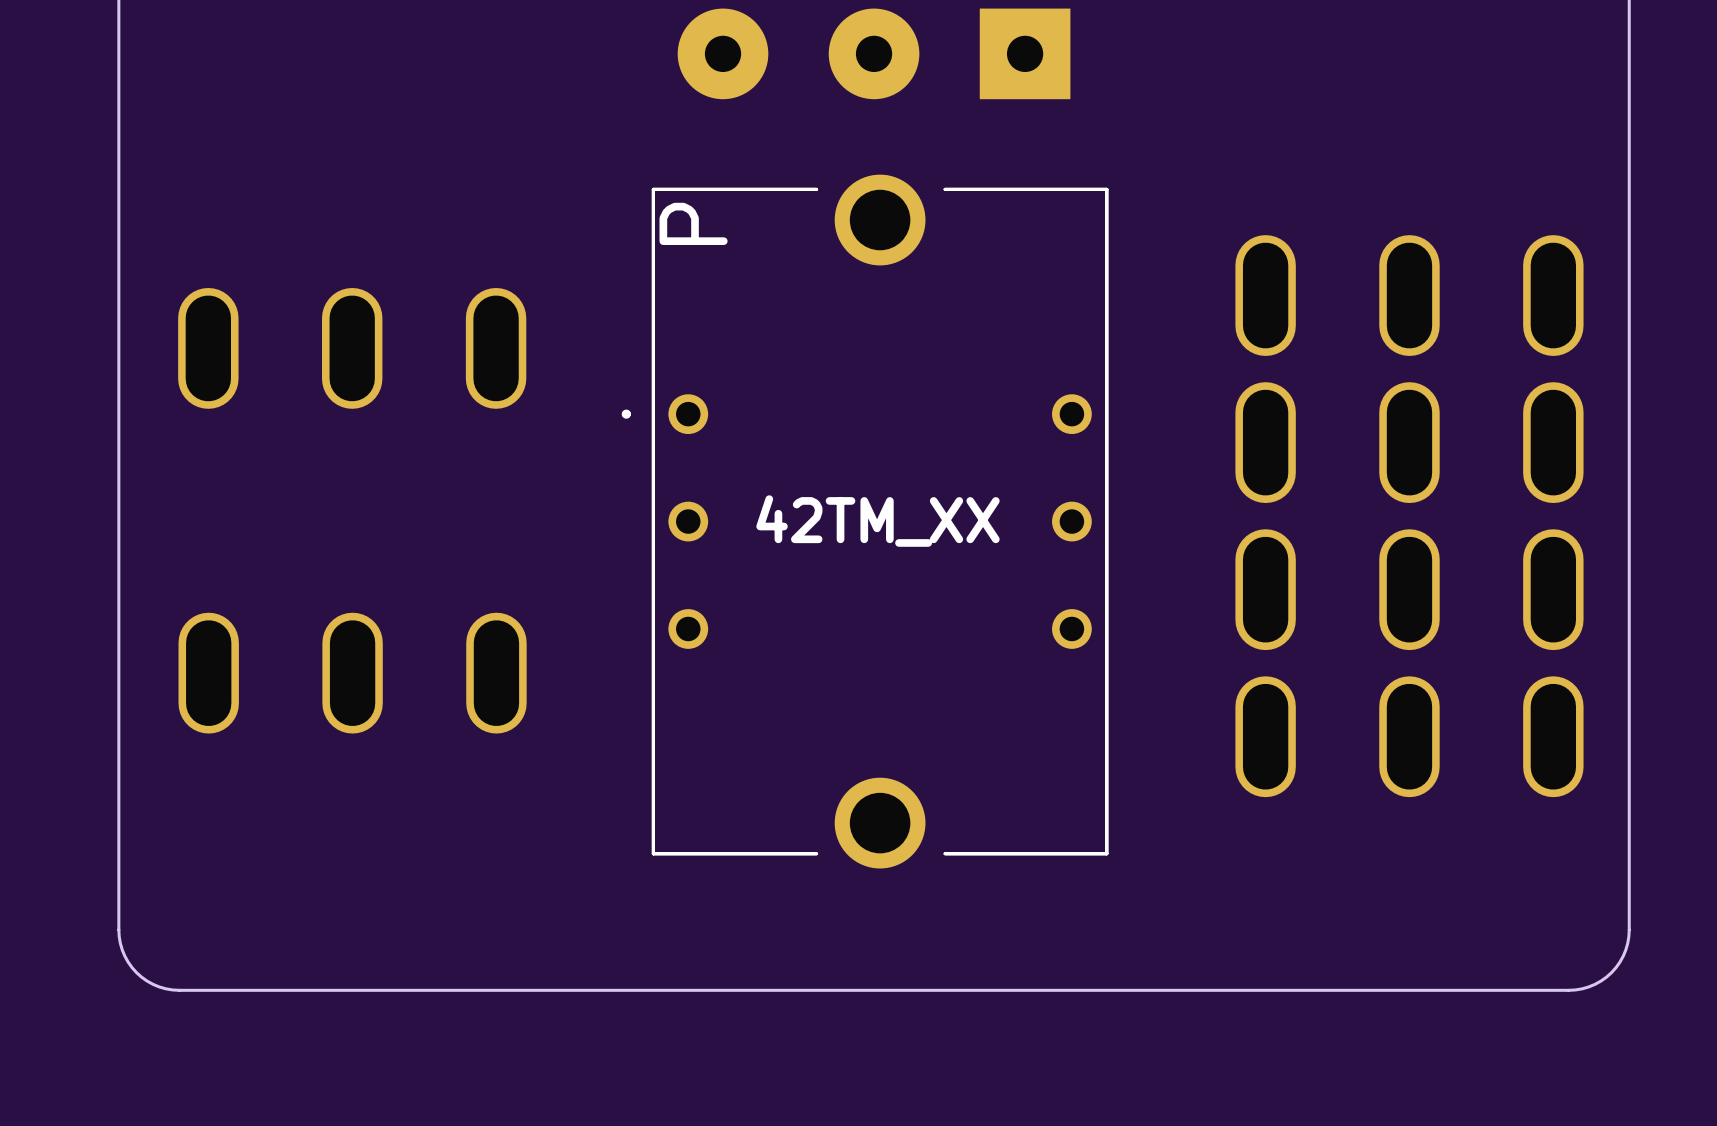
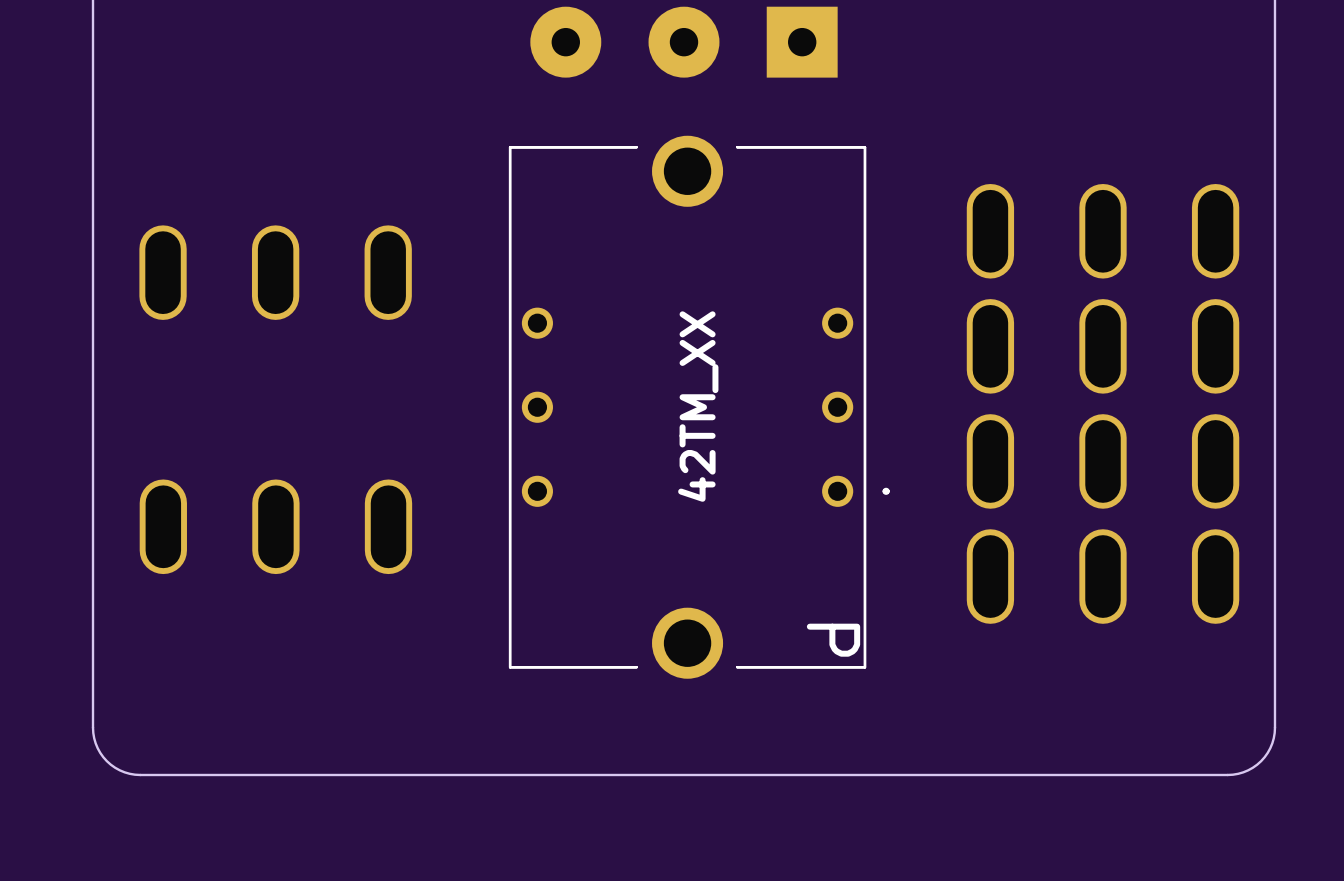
part rotation: 0° (865, 521) -> 180° (699, 407)

